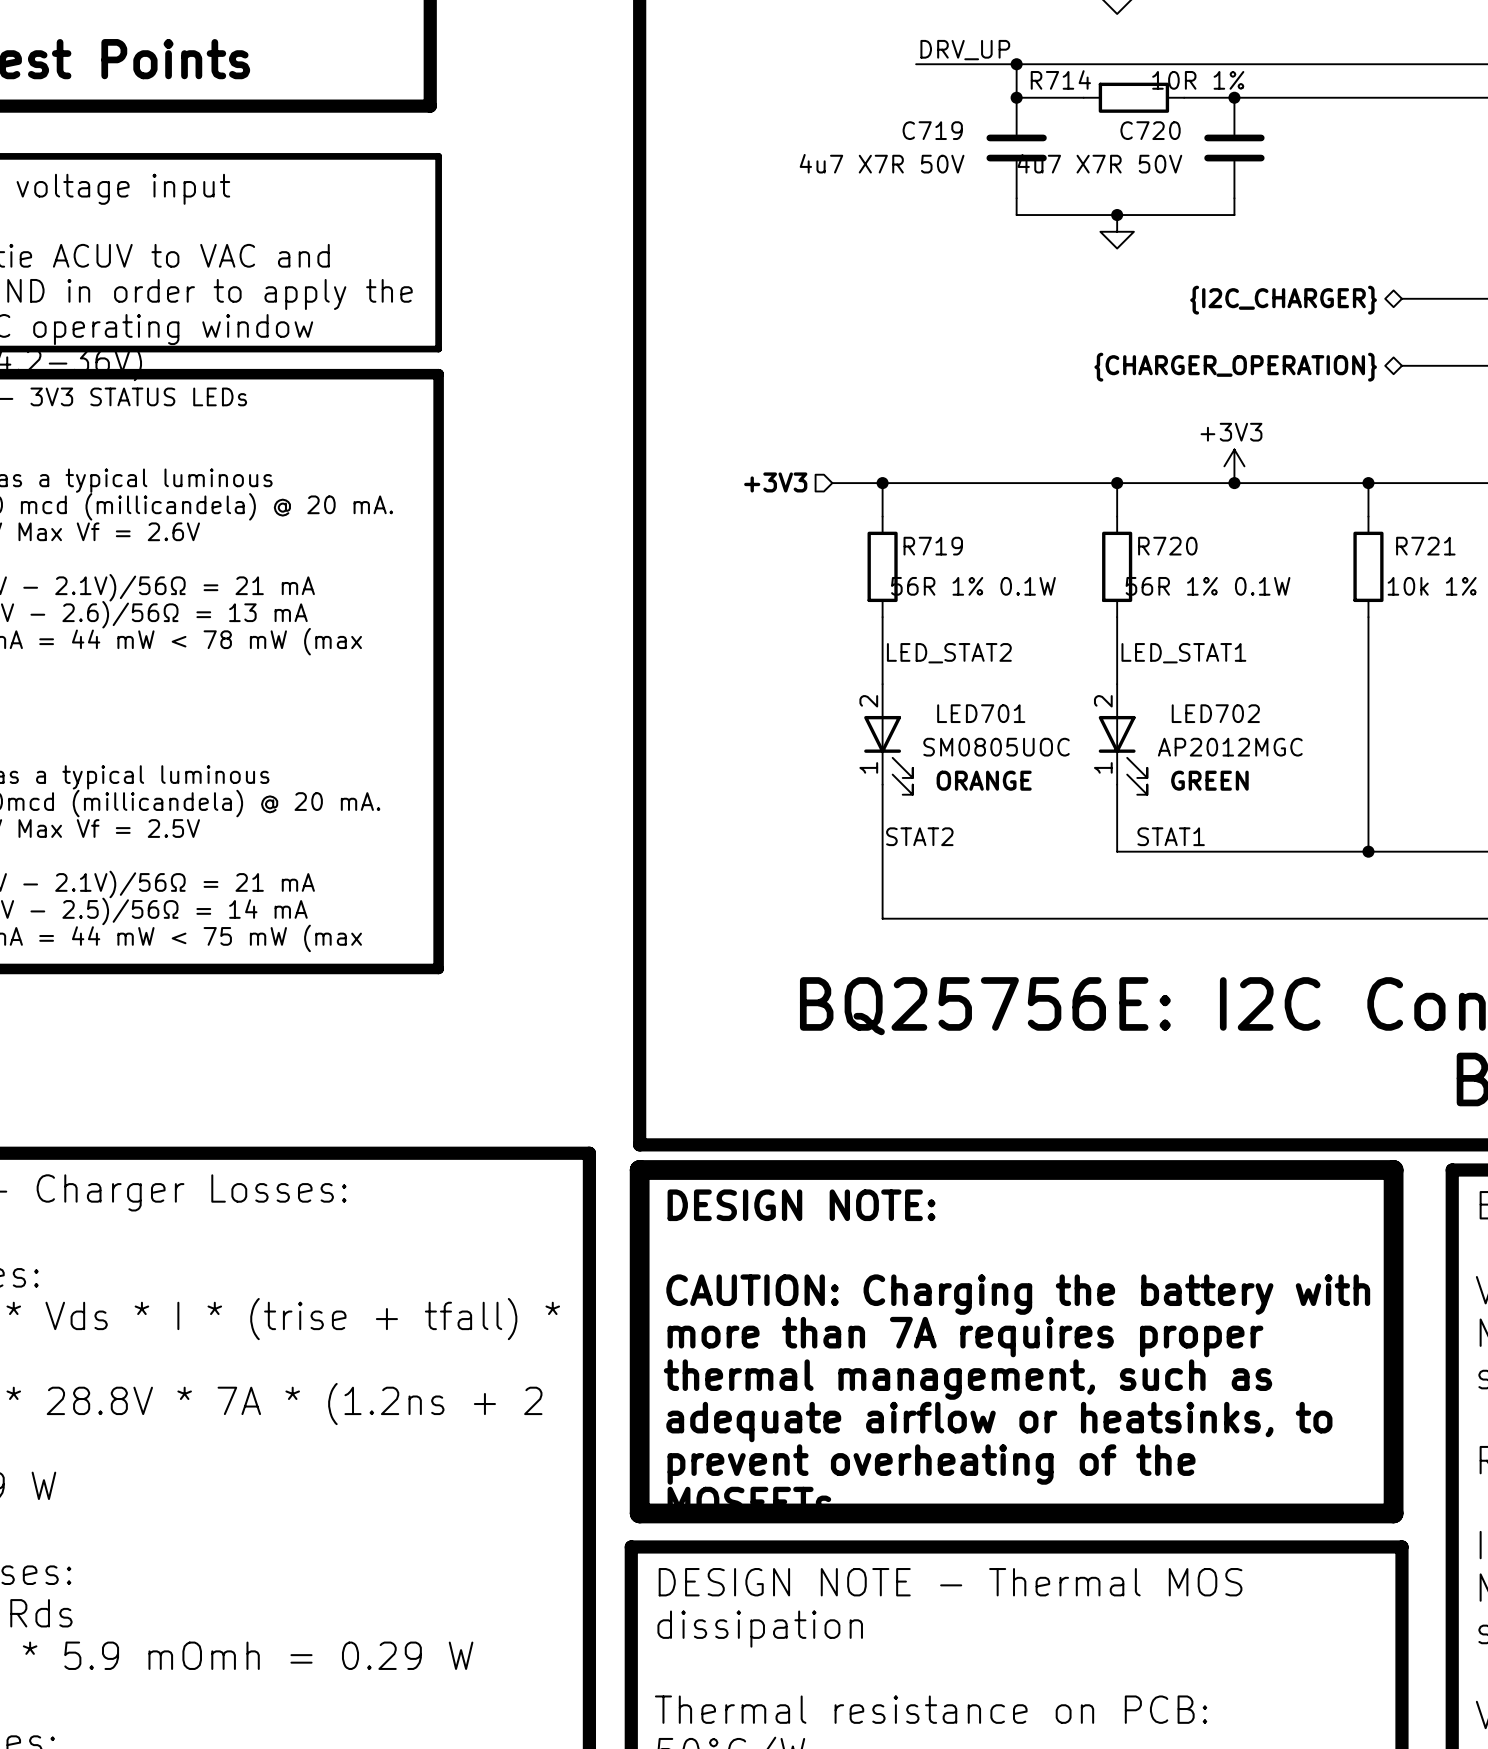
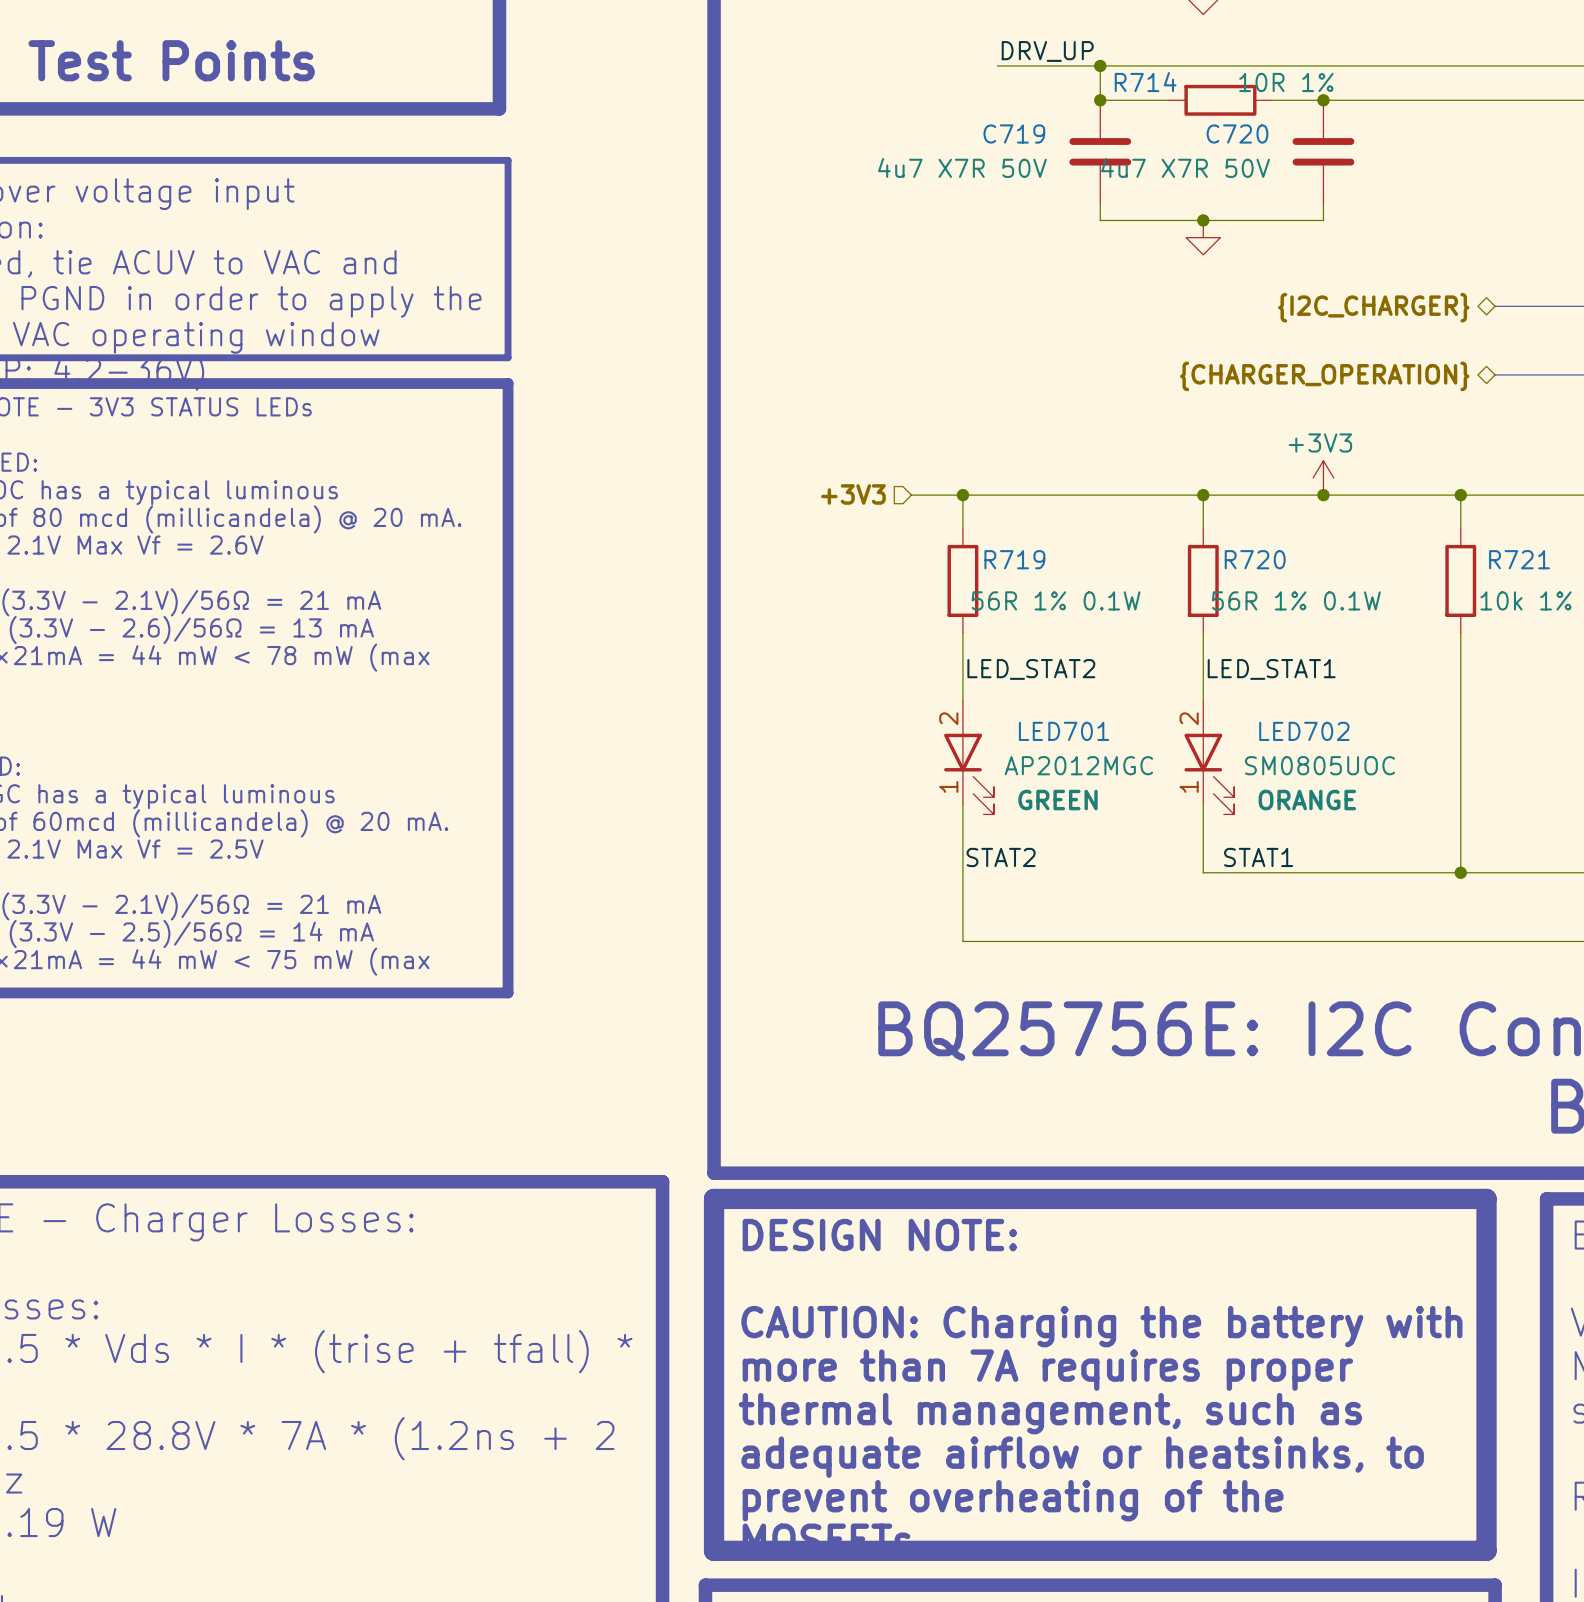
LED701 text: SM0805UOC (996, 747) -> AP2012MGC (1078, 765)
LED702 text: AP2012MGC (1230, 747) -> SM0805UOC (1320, 765)
LED701 value: ORANGE (984, 780) -> GREEN (1057, 800)
LED702 value: GREEN (1209, 780) -> ORANGE (1307, 800)

